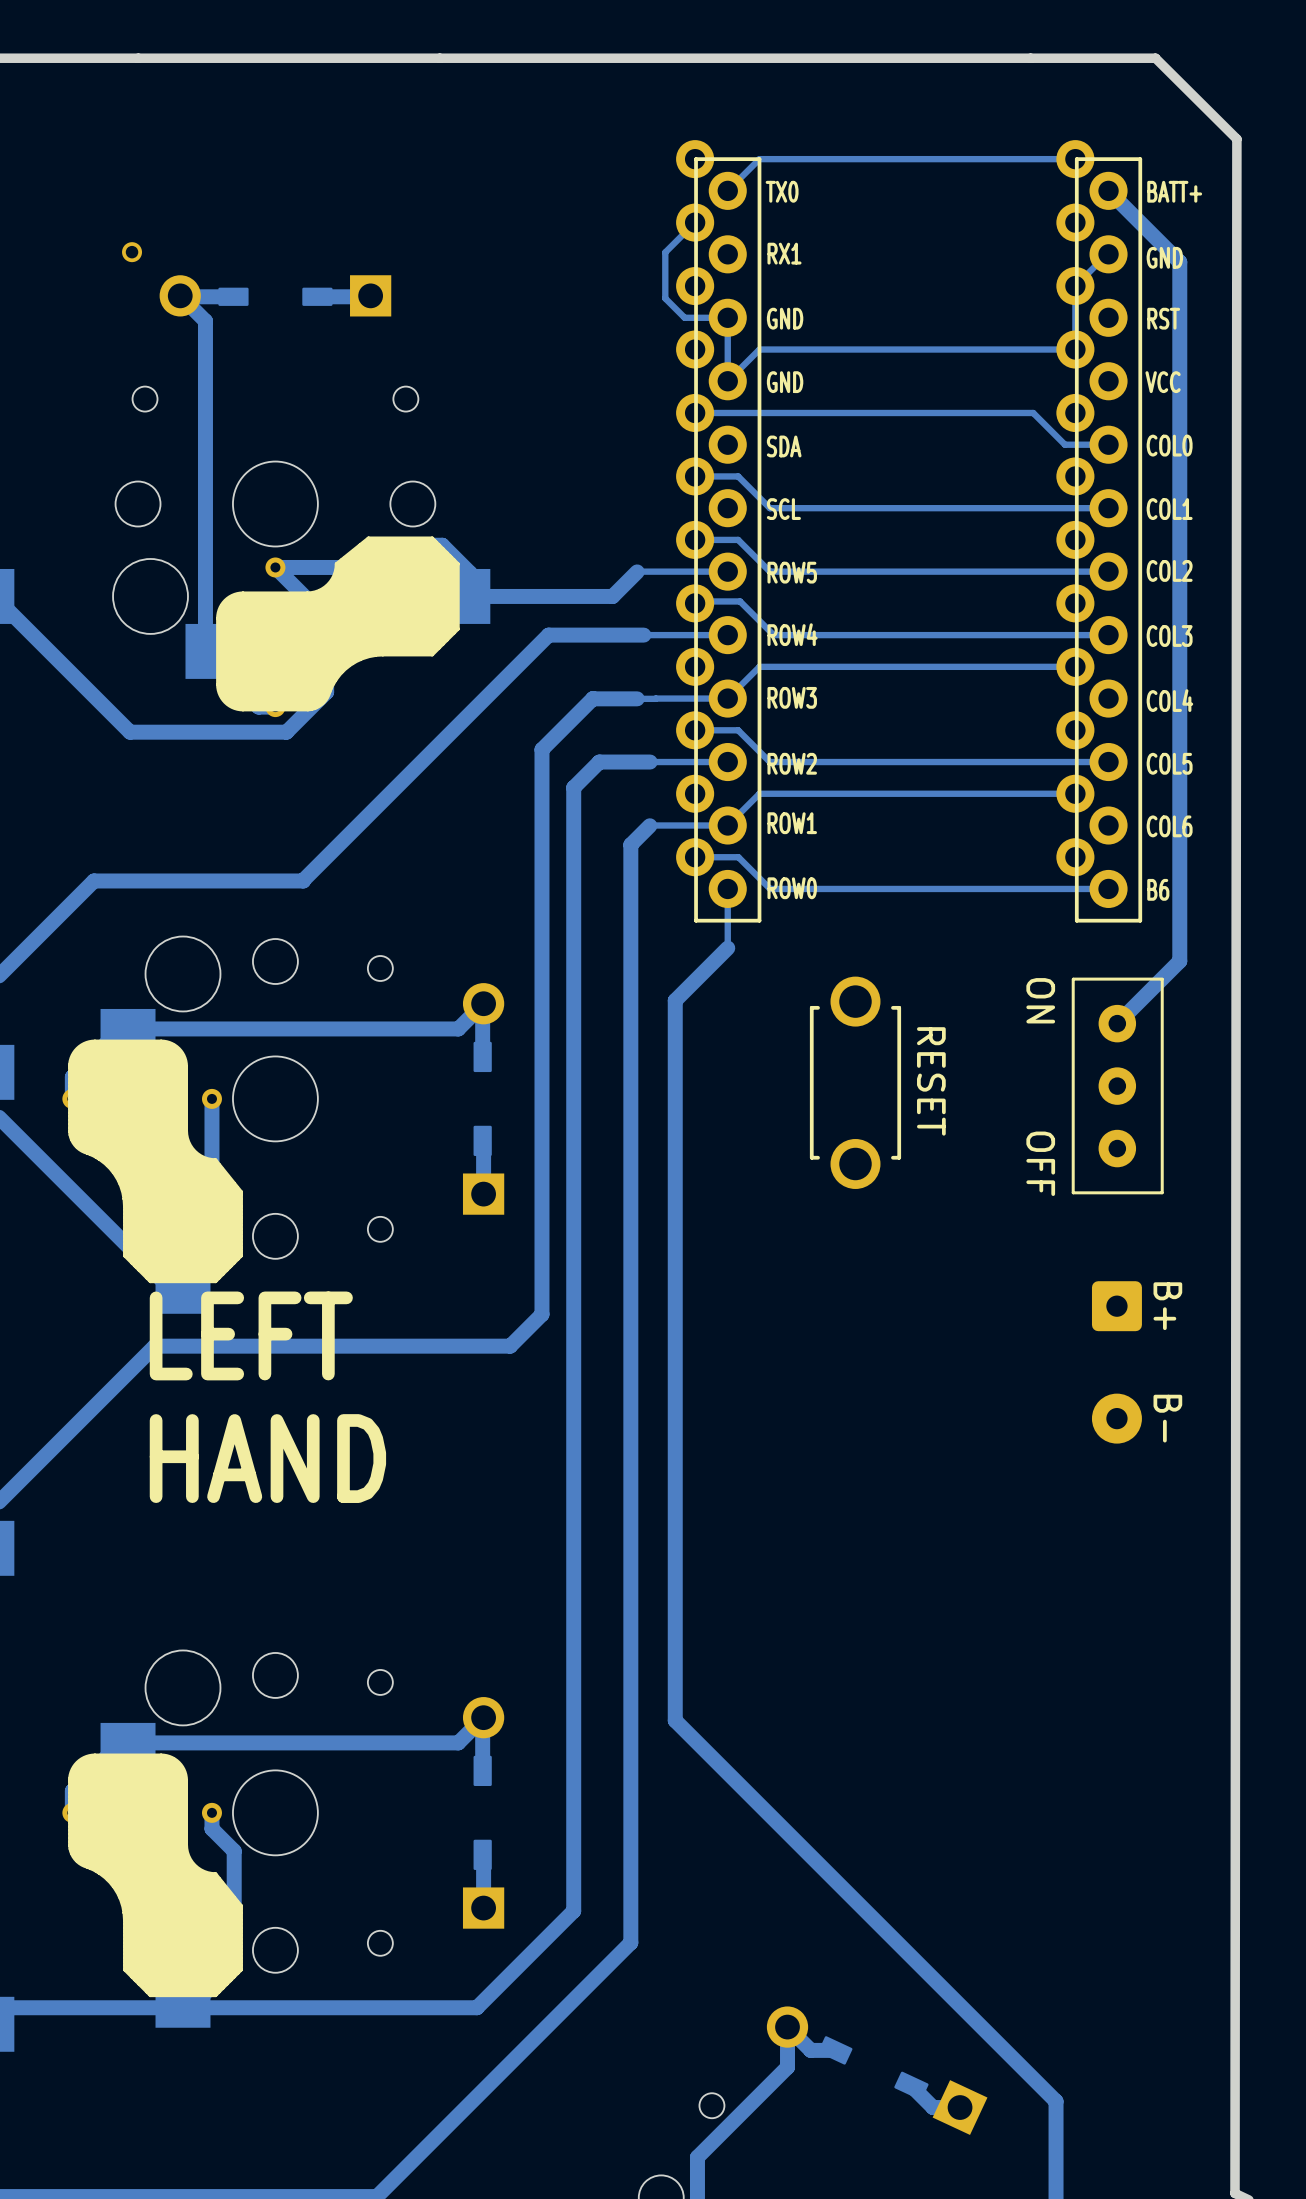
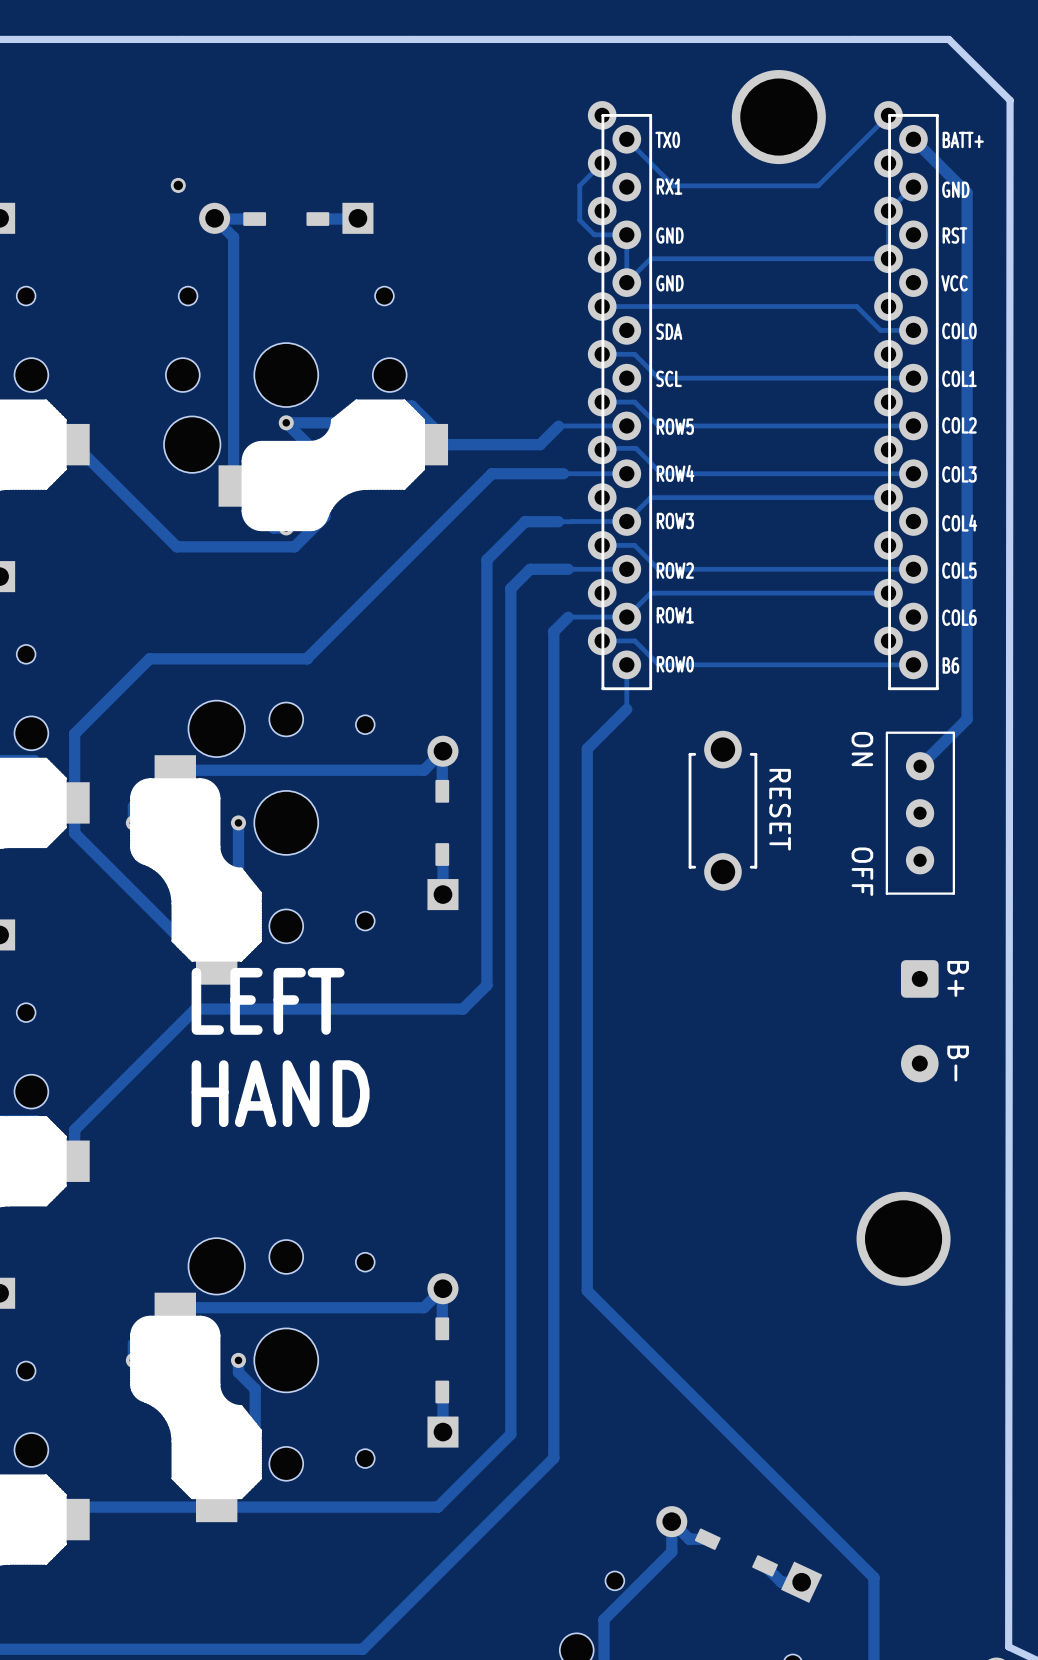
track: (1075, 159) (759, 159) (727, 190) -> (888, 115) (818, 185) (673, 185) (626, 139)
part: none -> (778, 117)
part: none -> (903, 1238)

